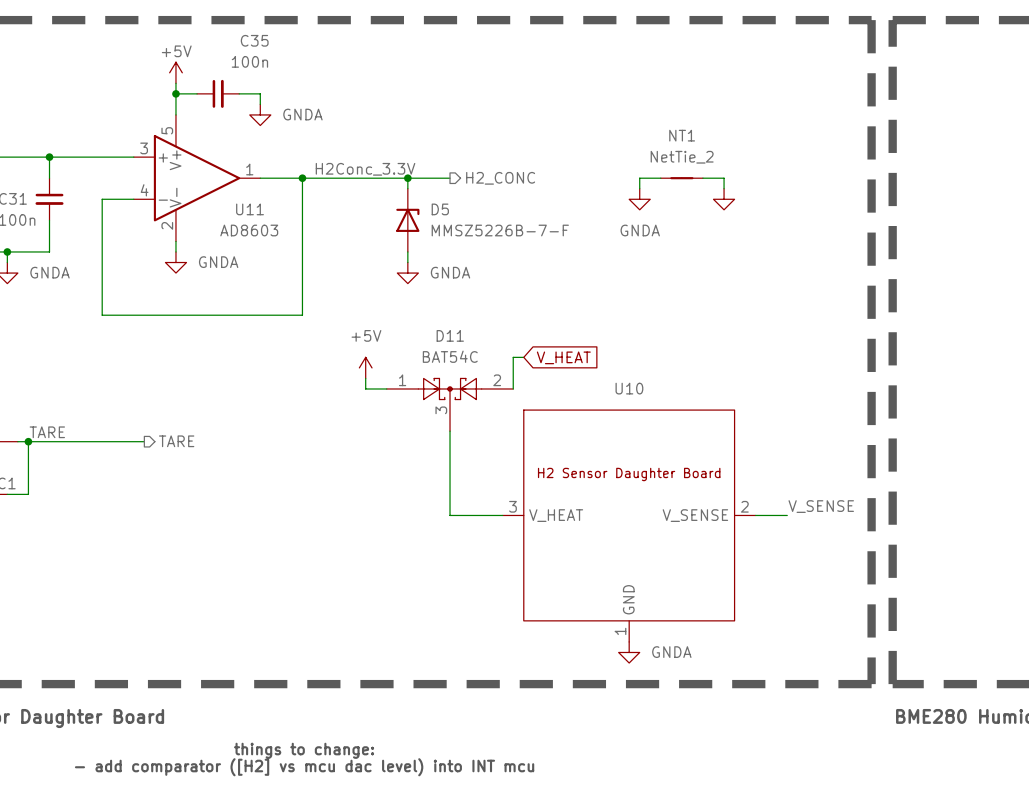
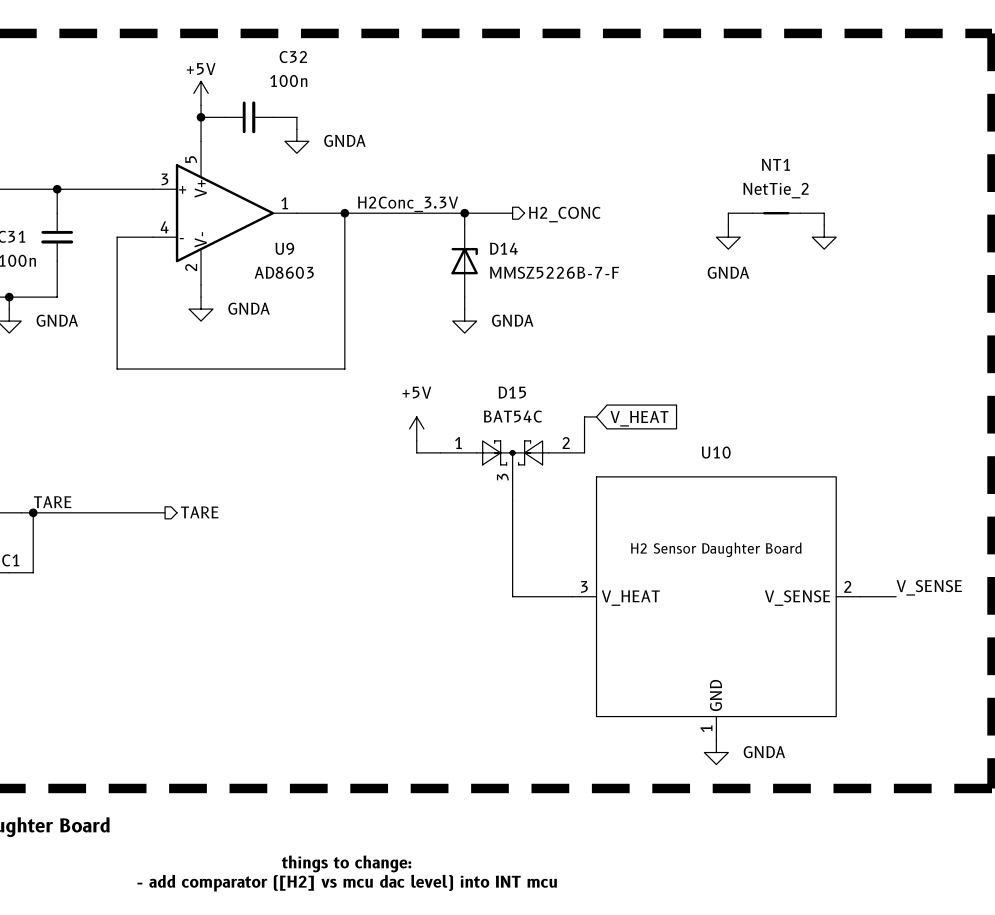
C35 name: C35 (254, 40) -> C32 (293, 57)
U11 name: U11 (250, 209) -> U9 (284, 248)
D5 name: D5 (440, 209) -> D14 (503, 248)
D11 name: D11 (450, 335) -> D15 (512, 392)

